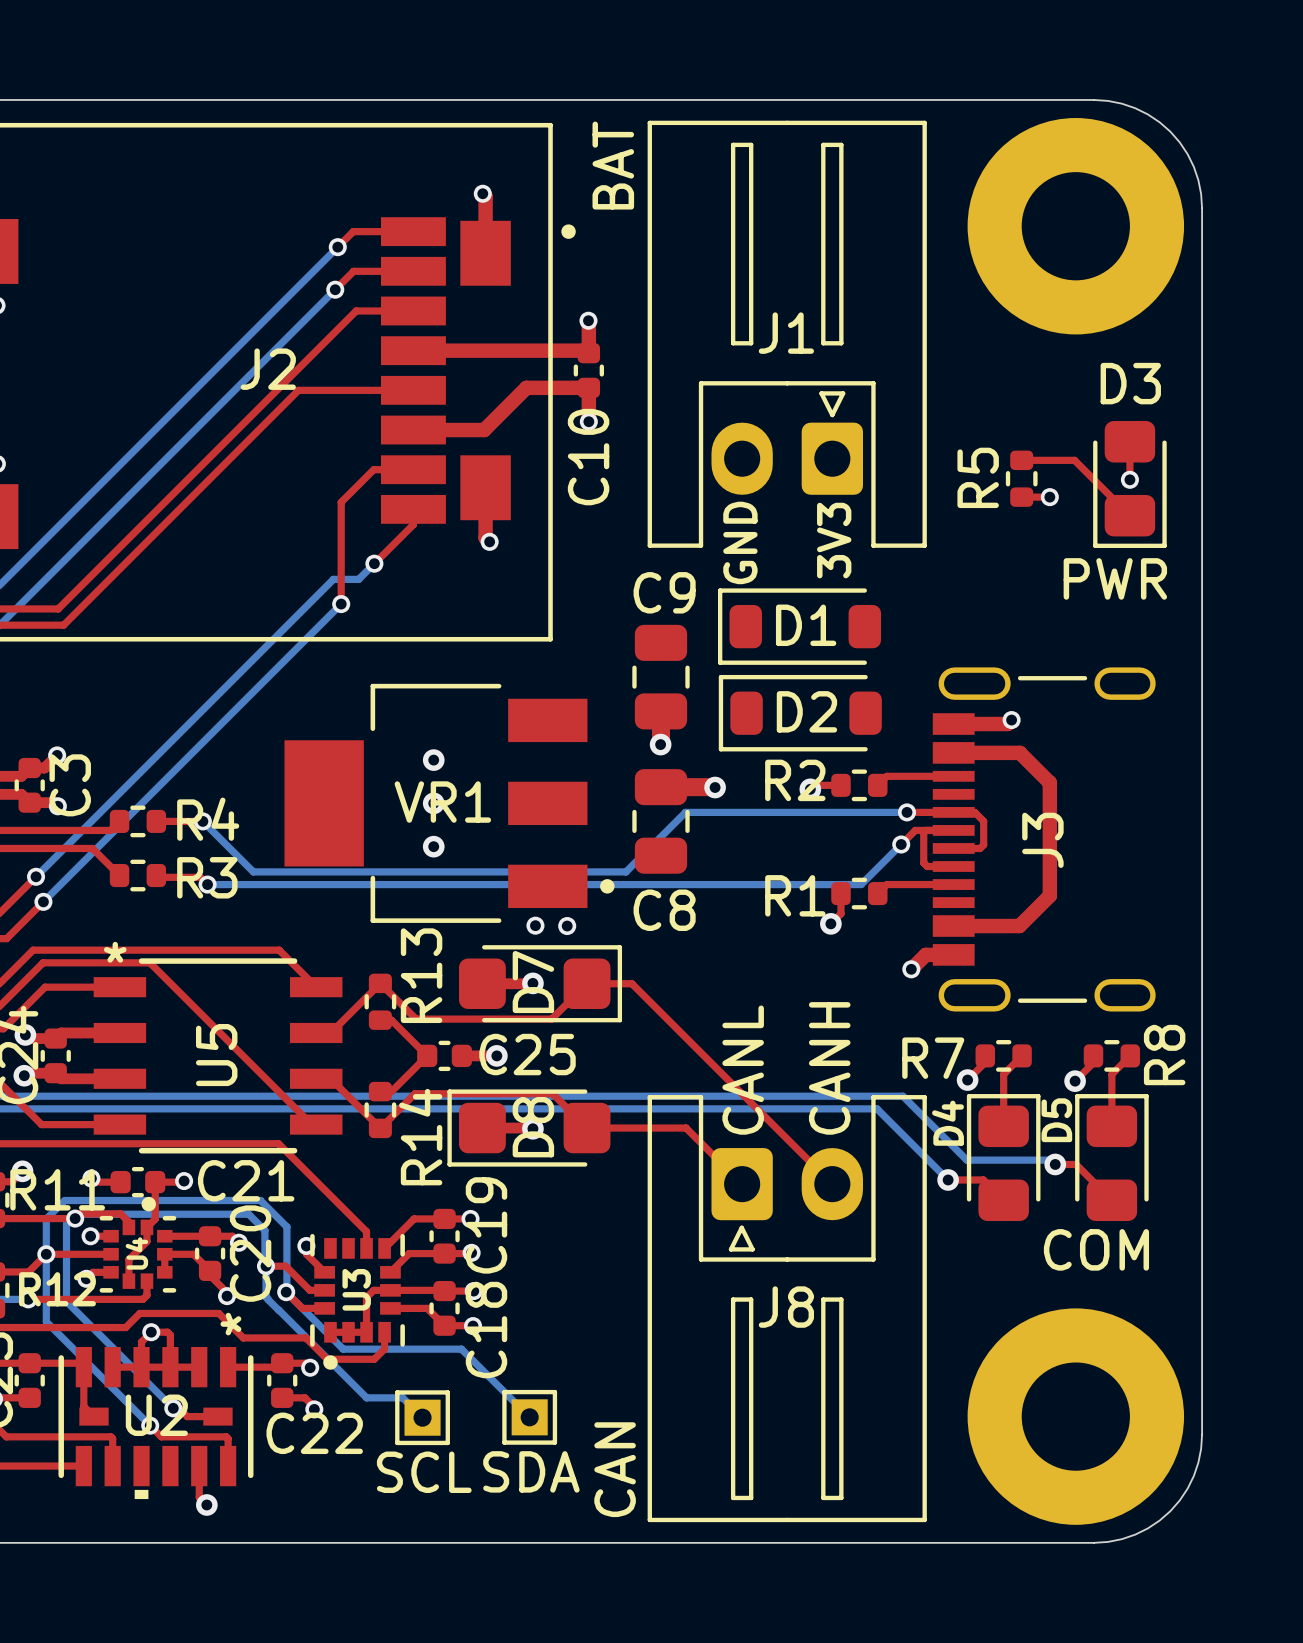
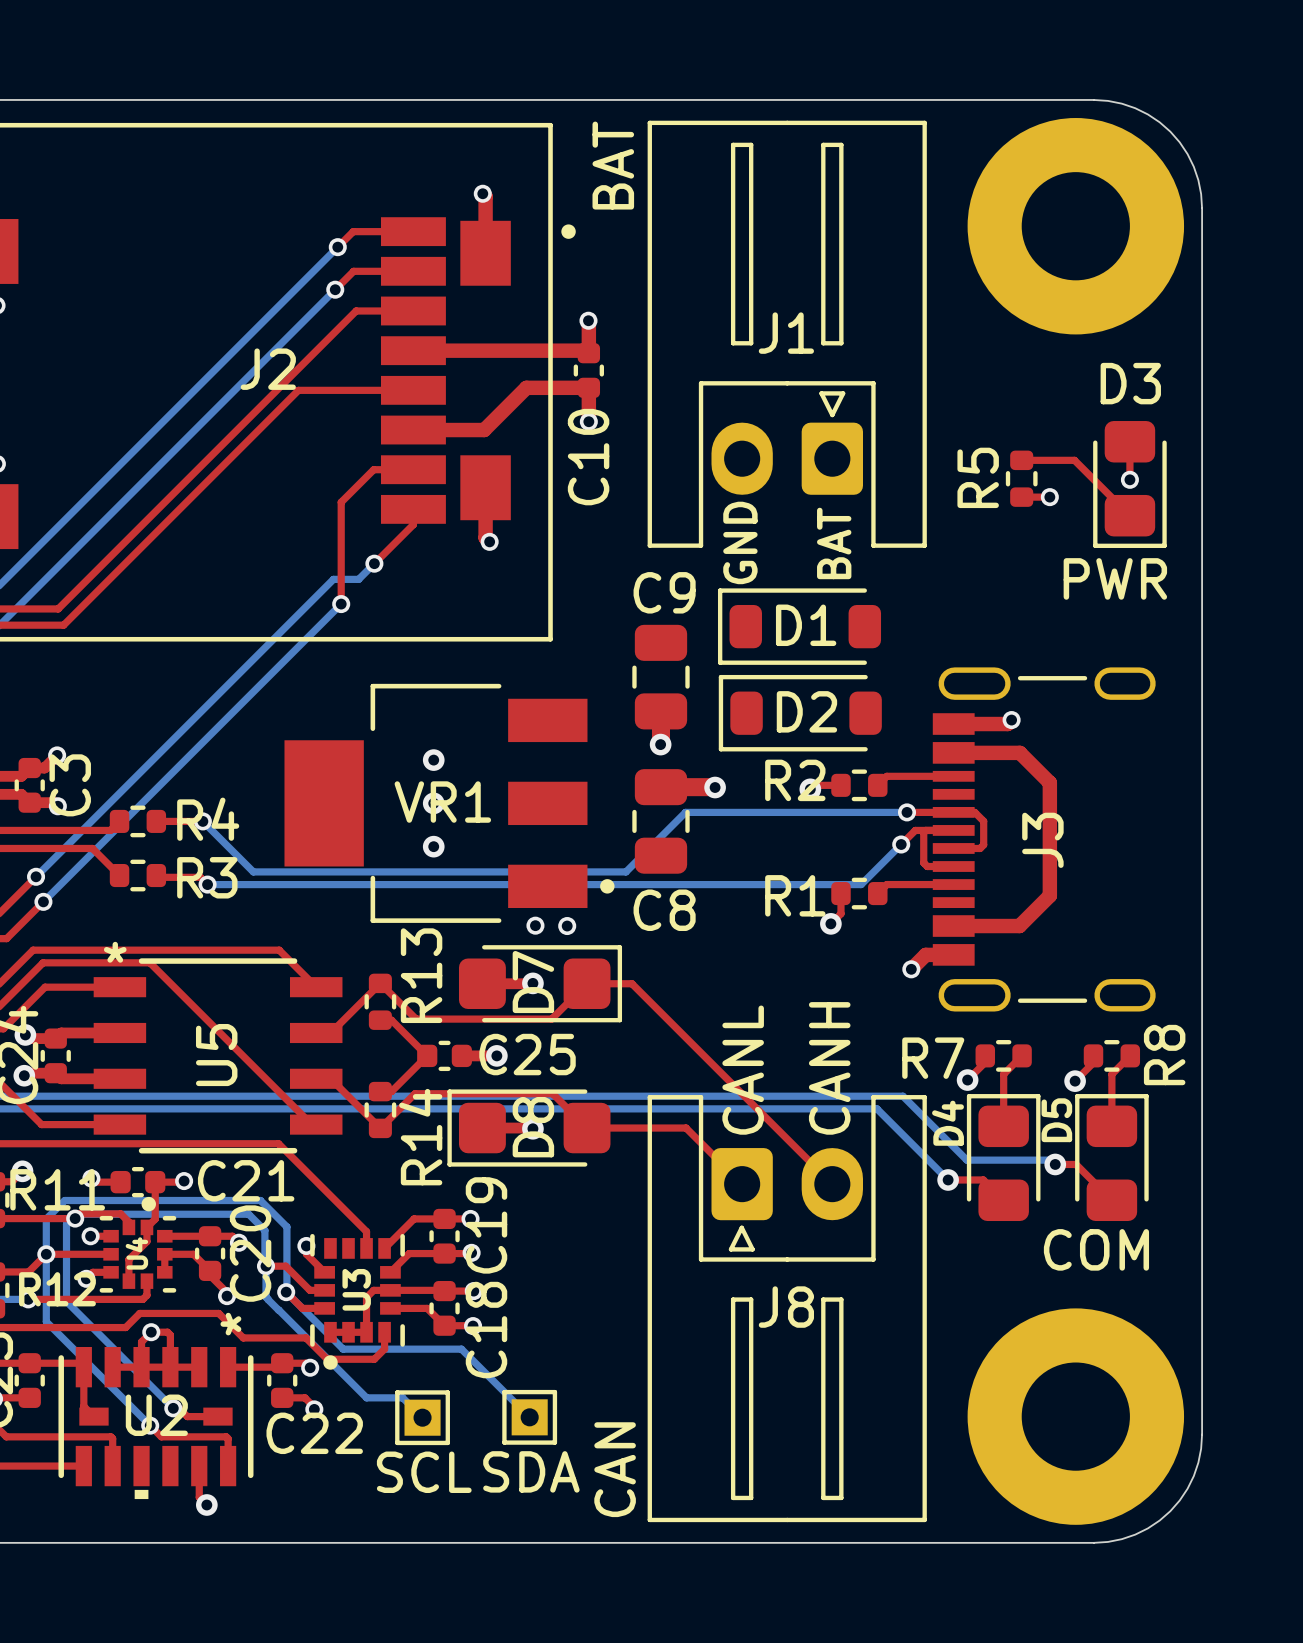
text: 3V3 (834, 540) -> BAT (834, 543)

